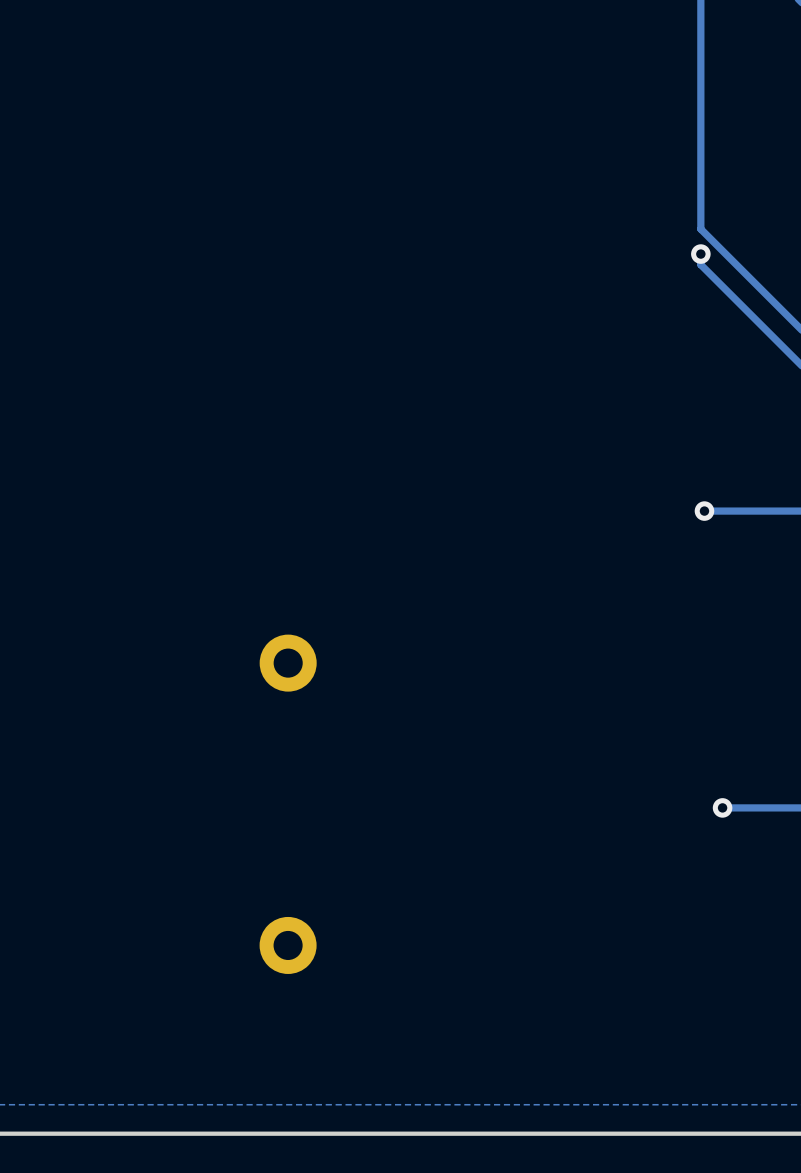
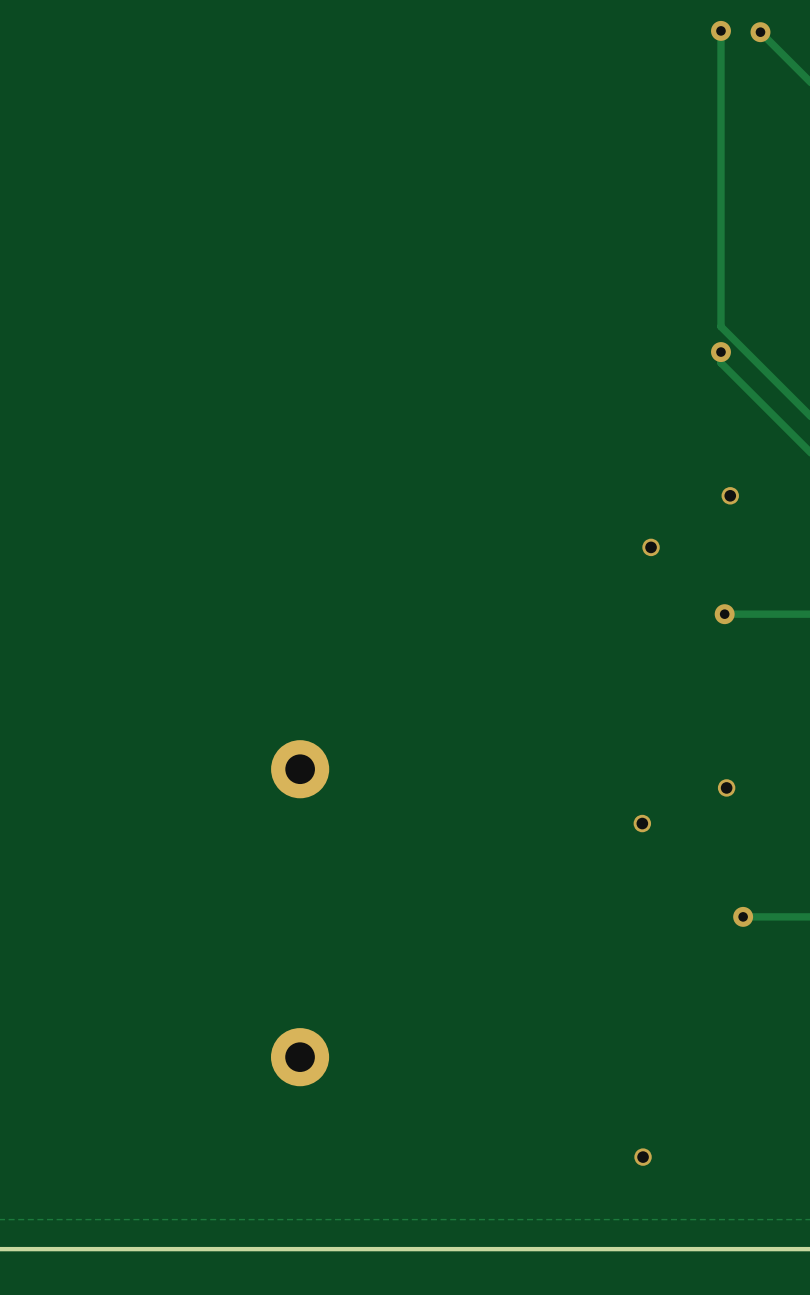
via: none -> (730, 495)
via: none -> (651, 547)
via: none -> (726, 787)
via: none -> (642, 823)
via: none -> (643, 1157)

